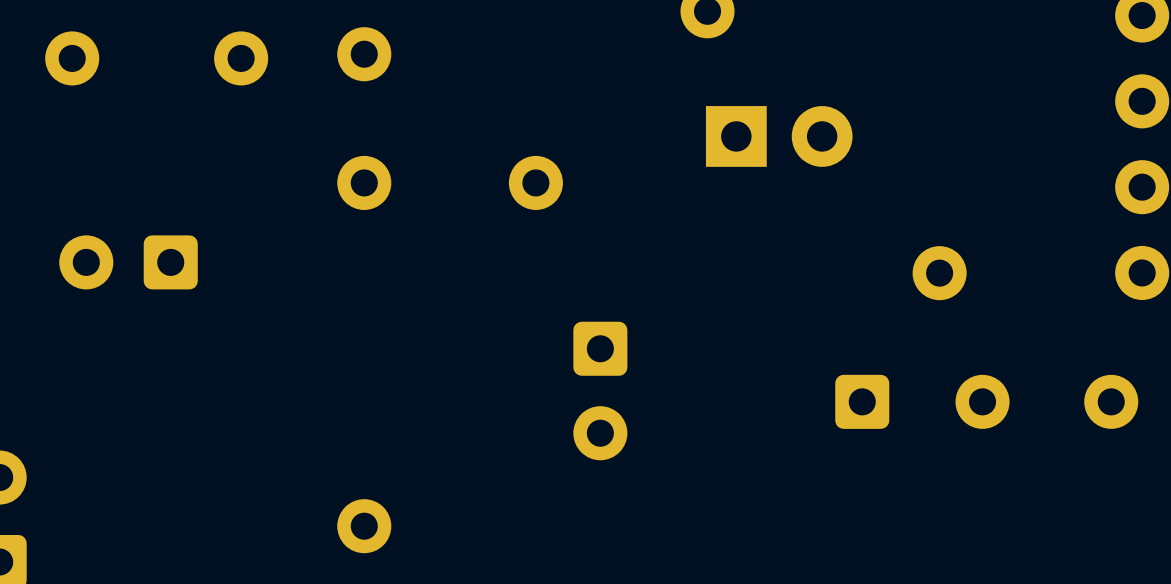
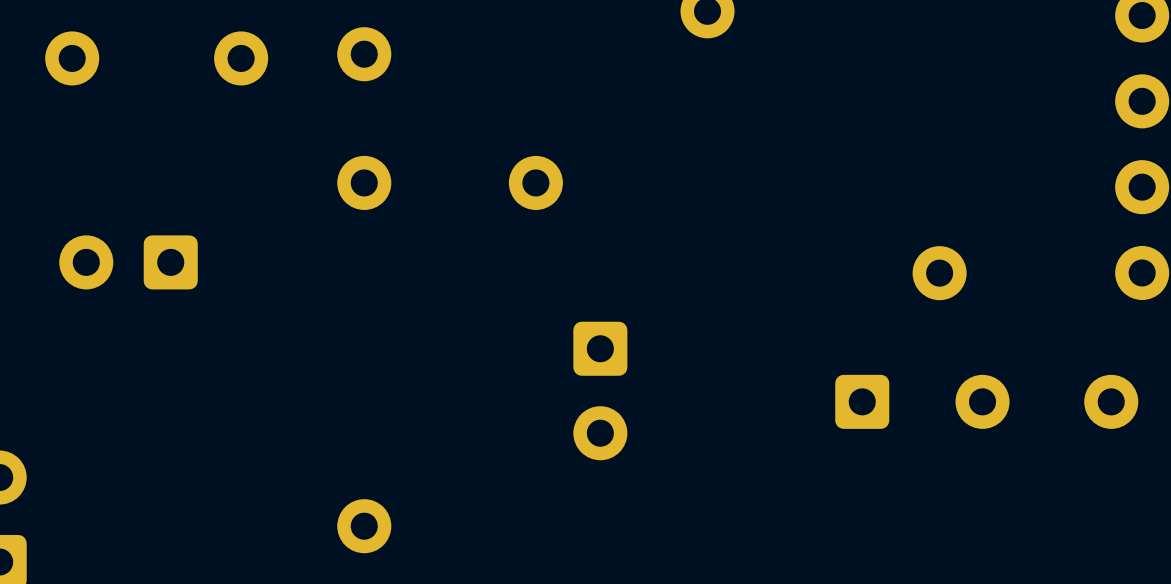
part: (779, 136) -> none

